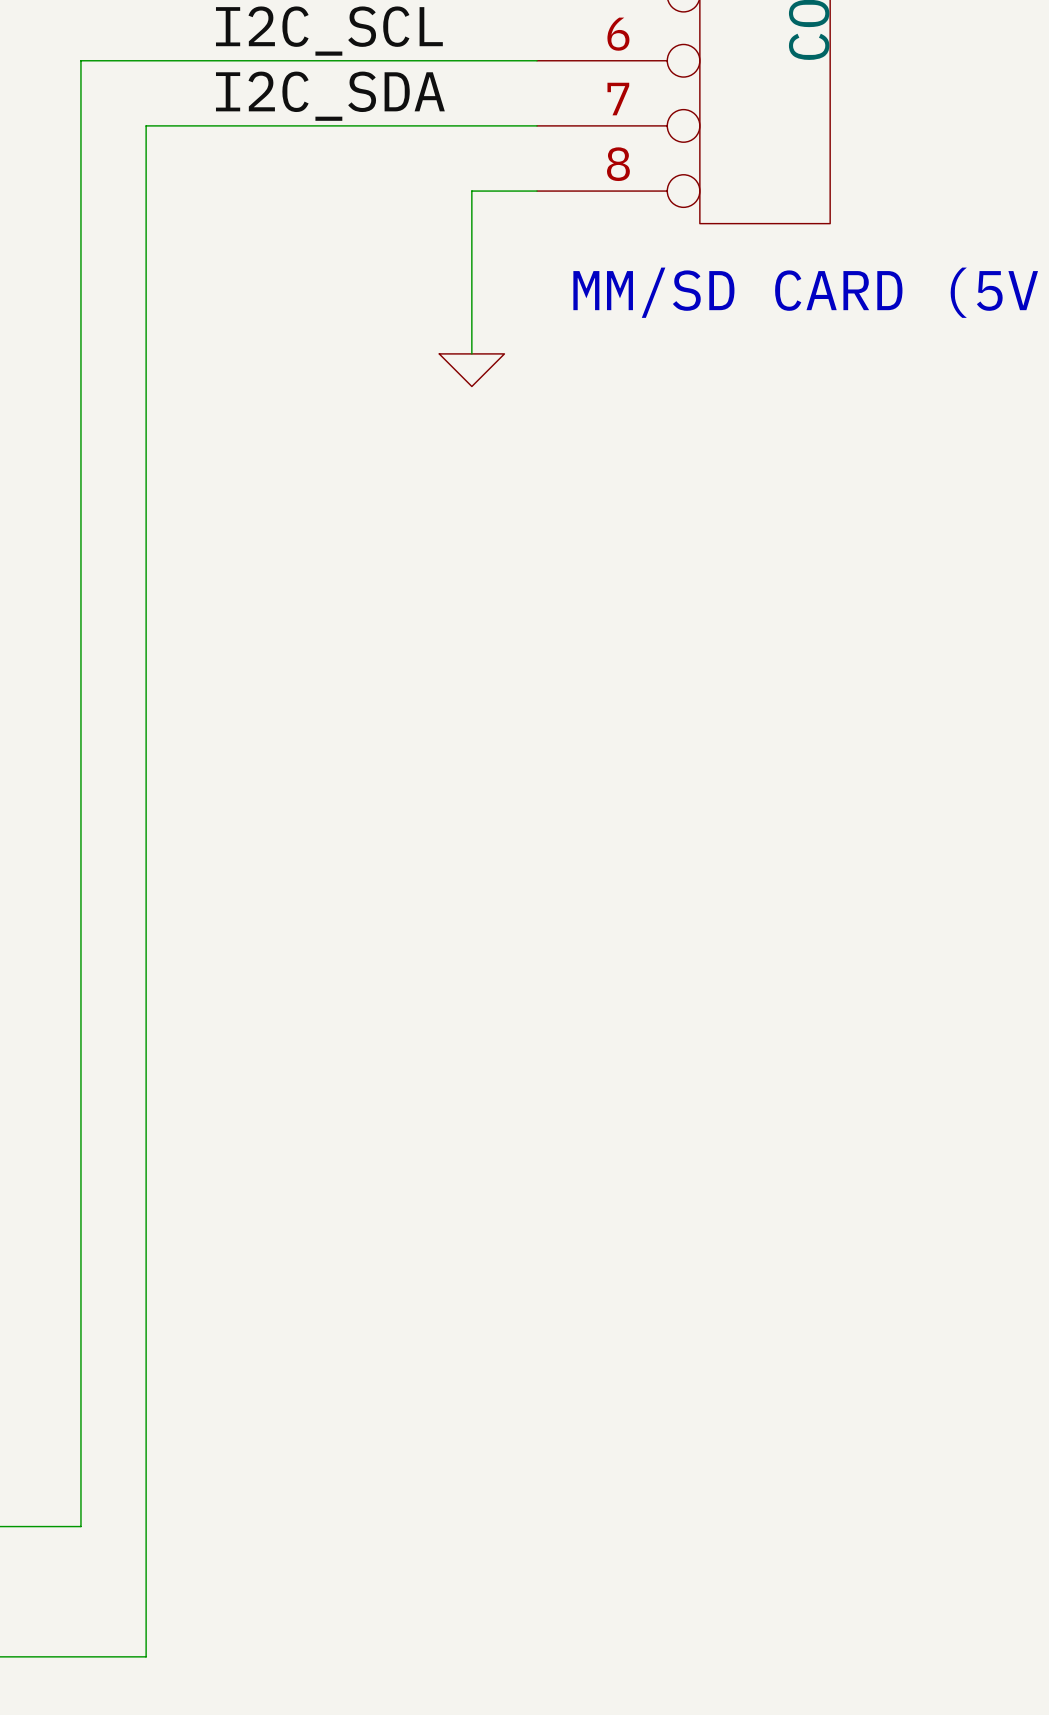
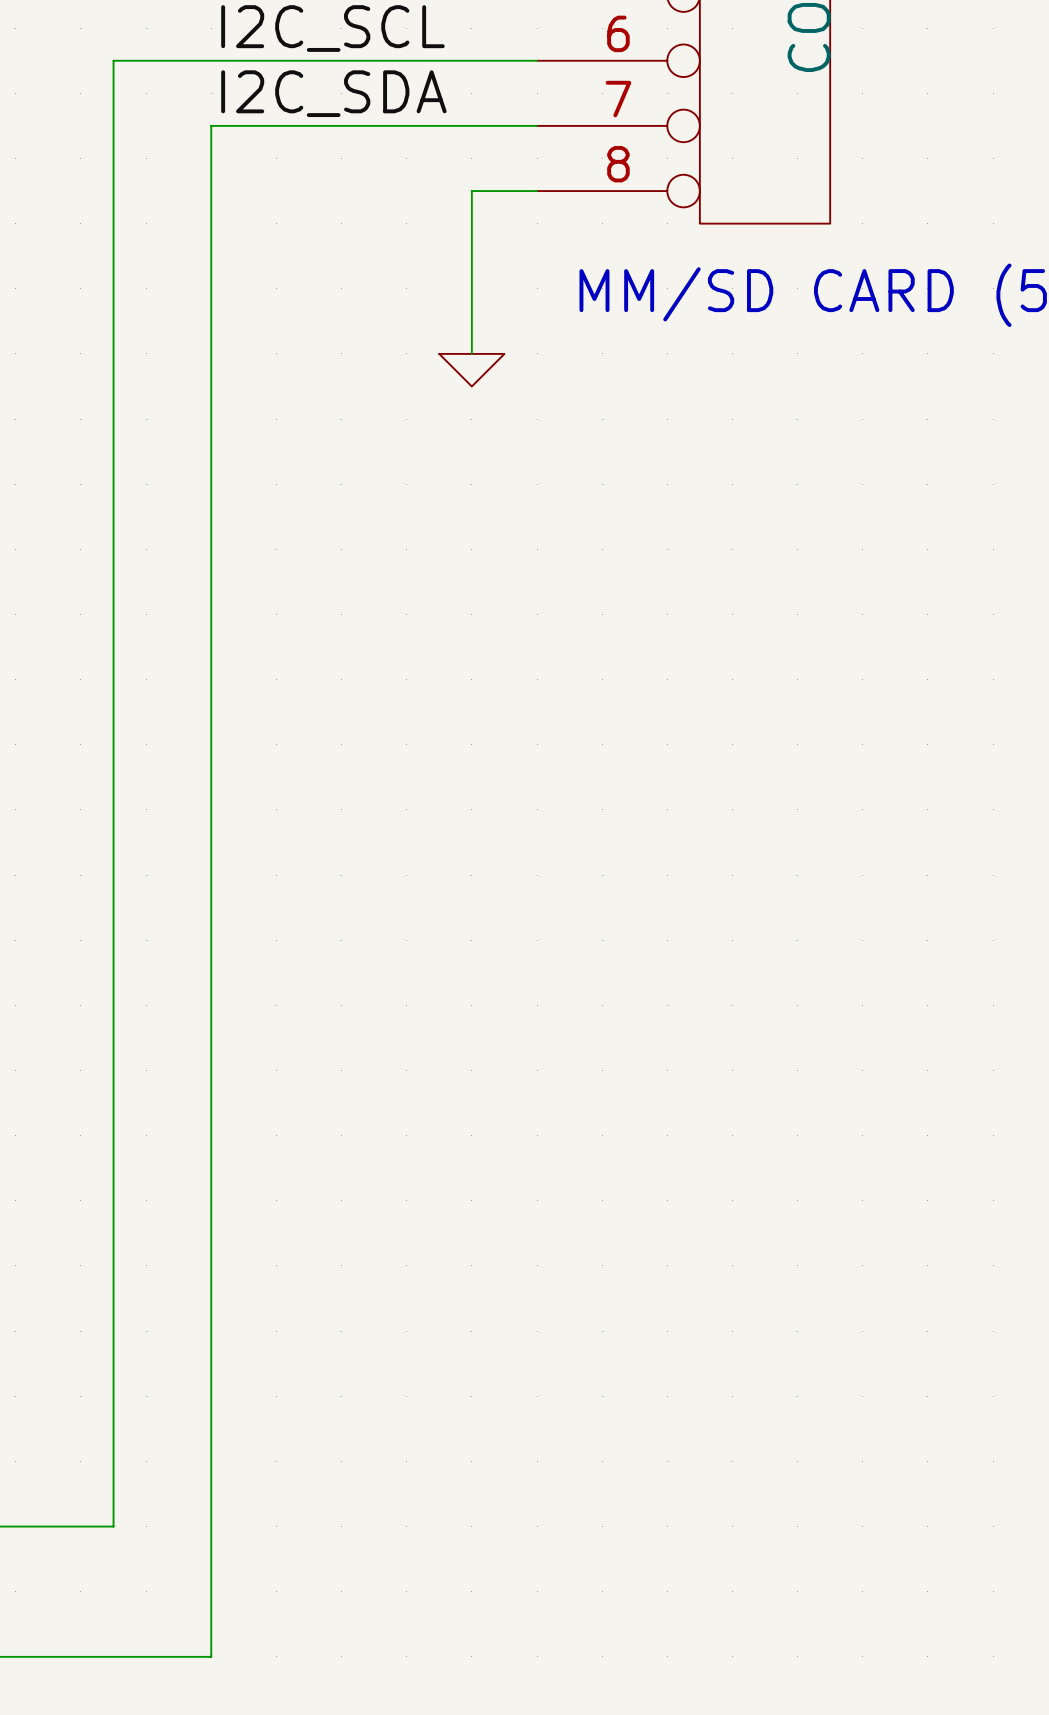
wire: (113, 60) (80, 60) (80, 1526) -> (113, 60) (113, 1526) (80, 1526)
wire: (211, 125) (146, 125) (146, 1656) -> (211, 125) (211, 1656) (146, 1656)

